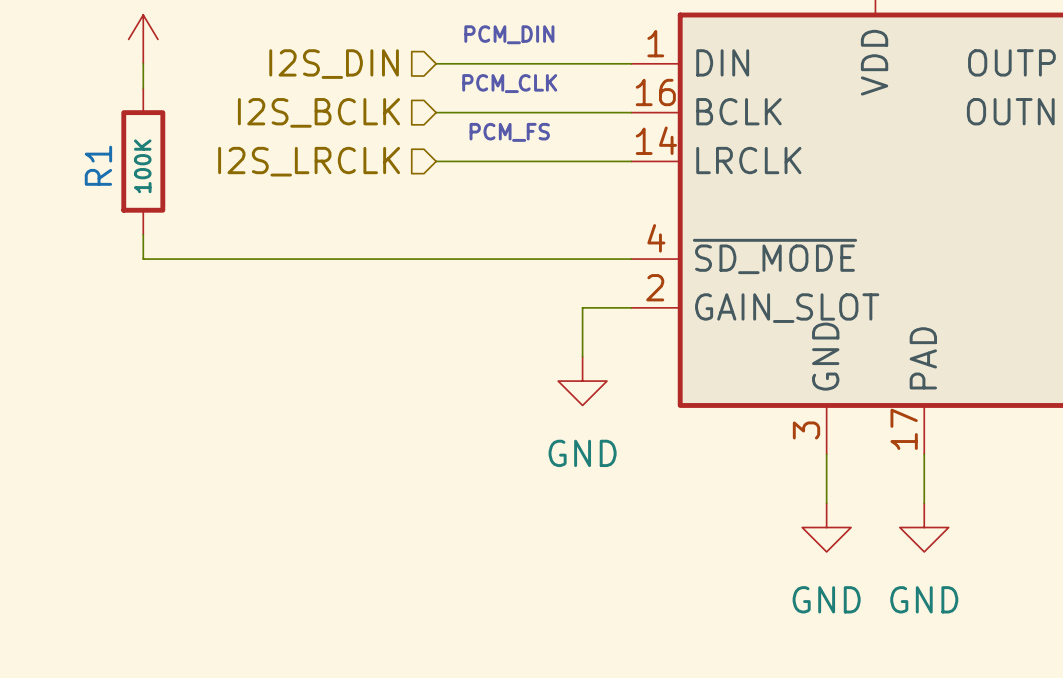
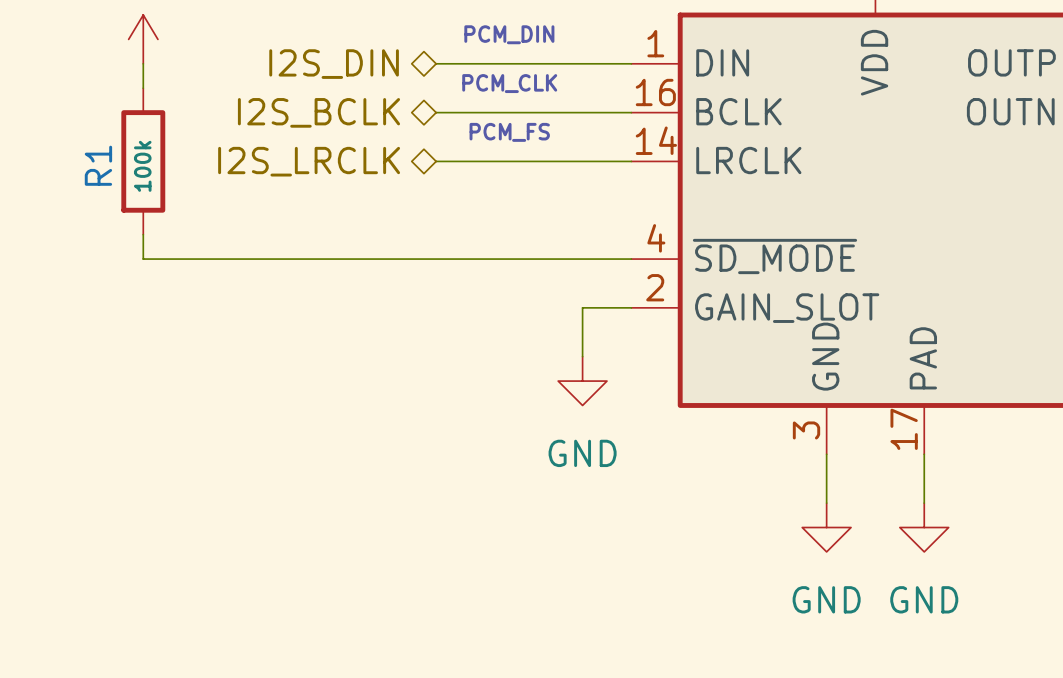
hierarchical label shape: input (334, 64) -> bidirectional (334, 64)
hierarchical label shape: input (318, 112) -> bidirectional (318, 112)
hierarchical label shape: input (309, 161) -> bidirectional (309, 161)
R1 value: 100K (142, 166) -> 100k (142, 166)

